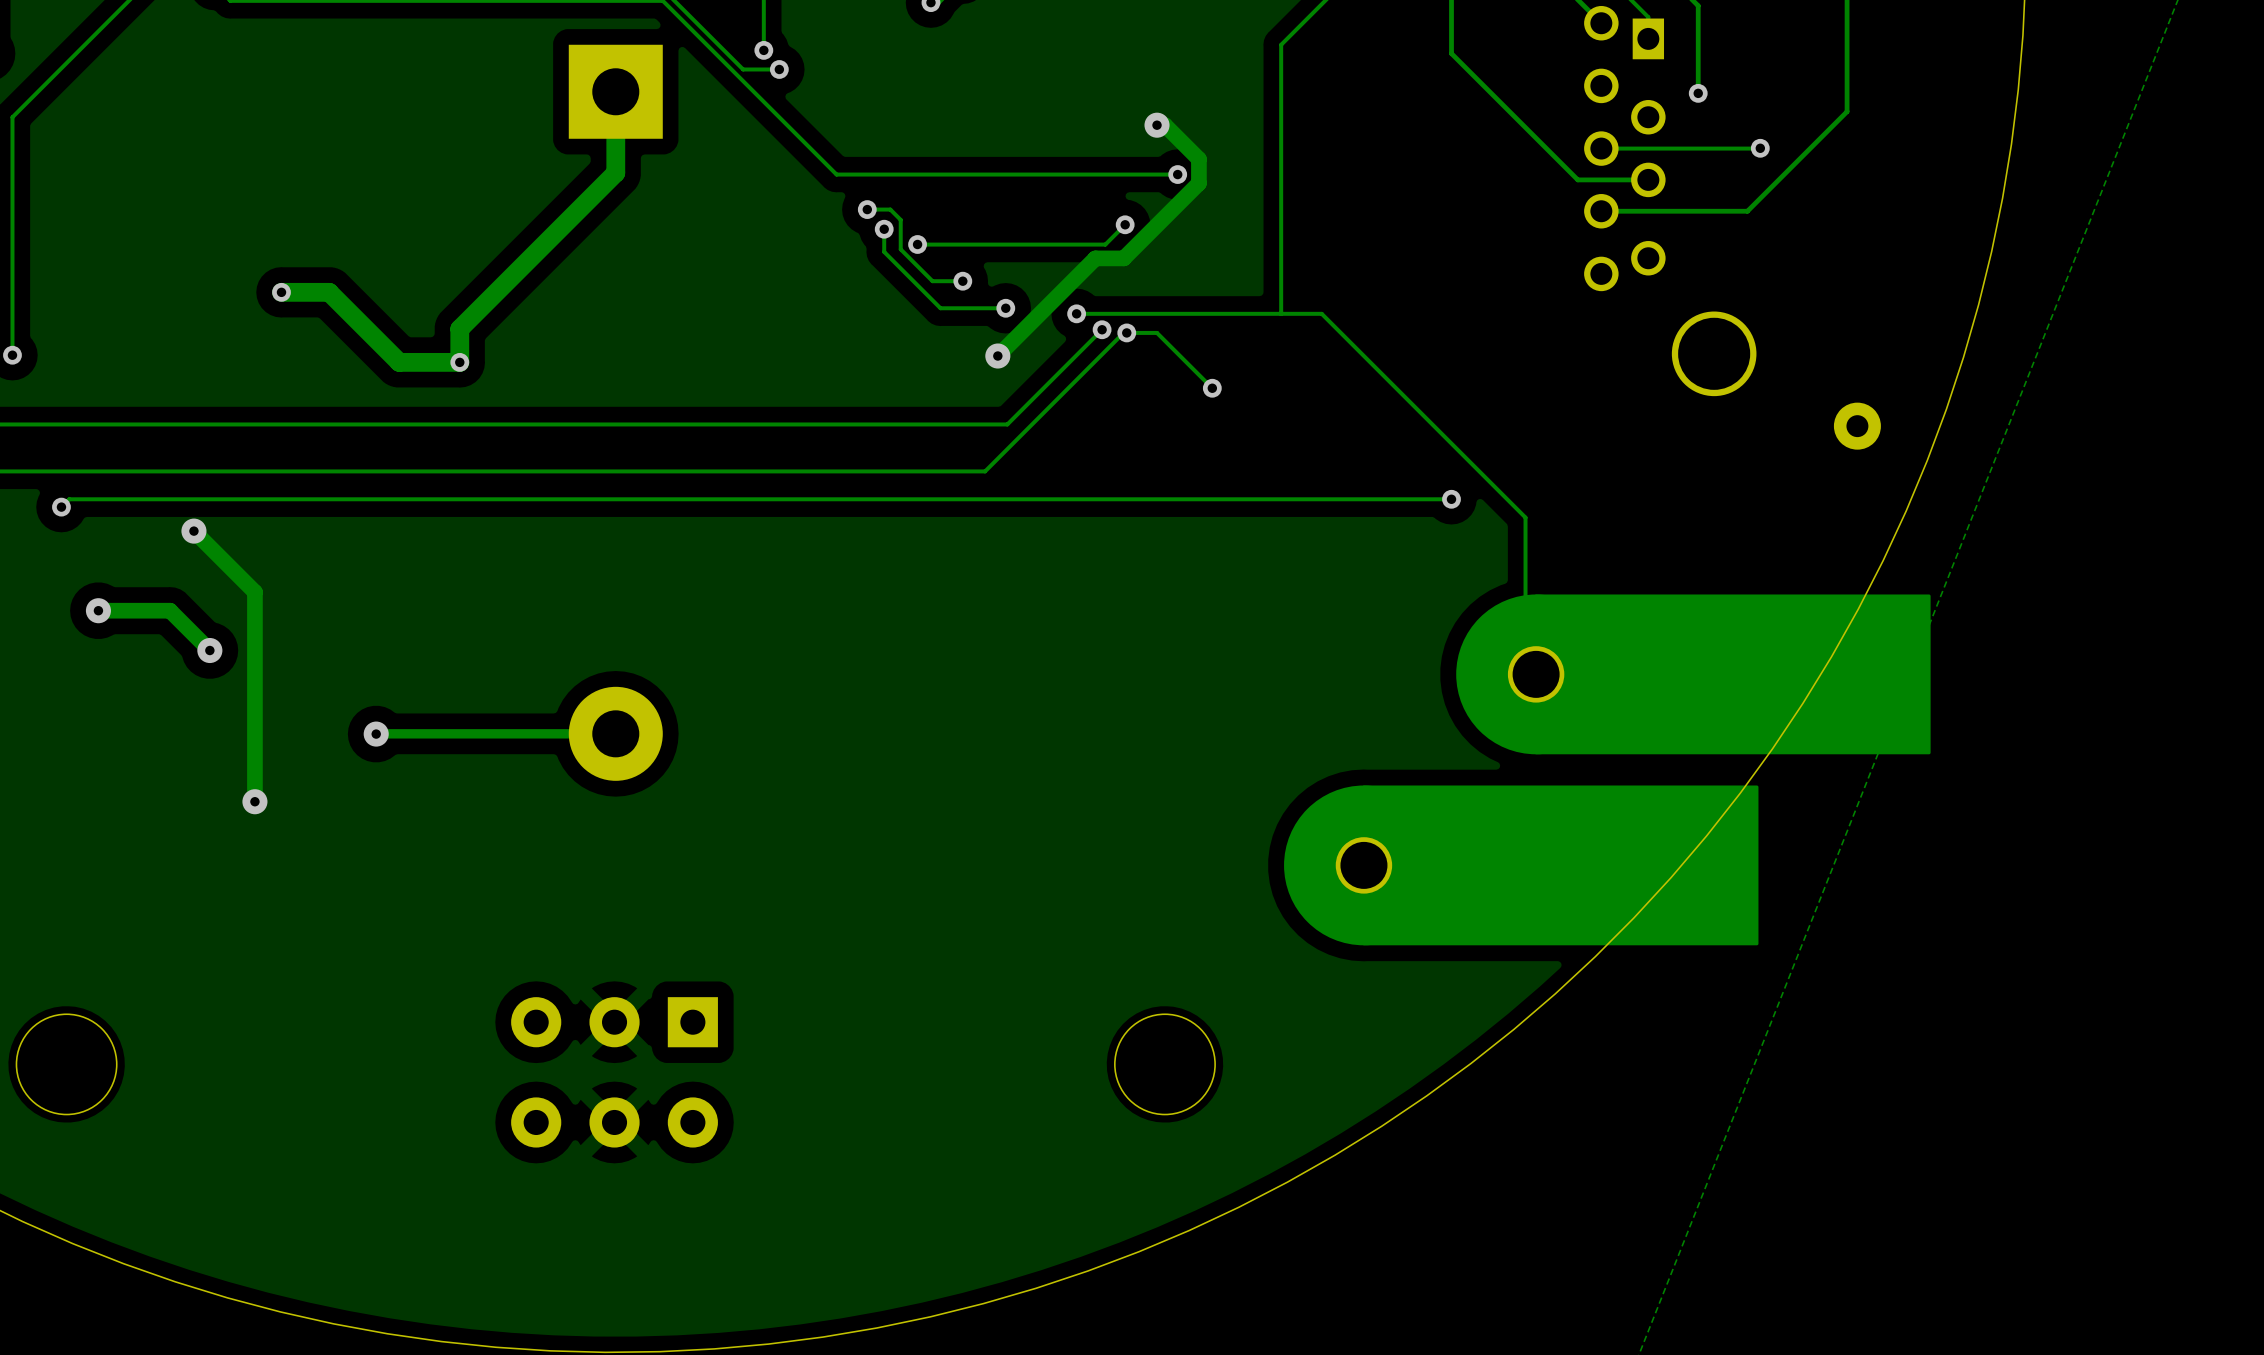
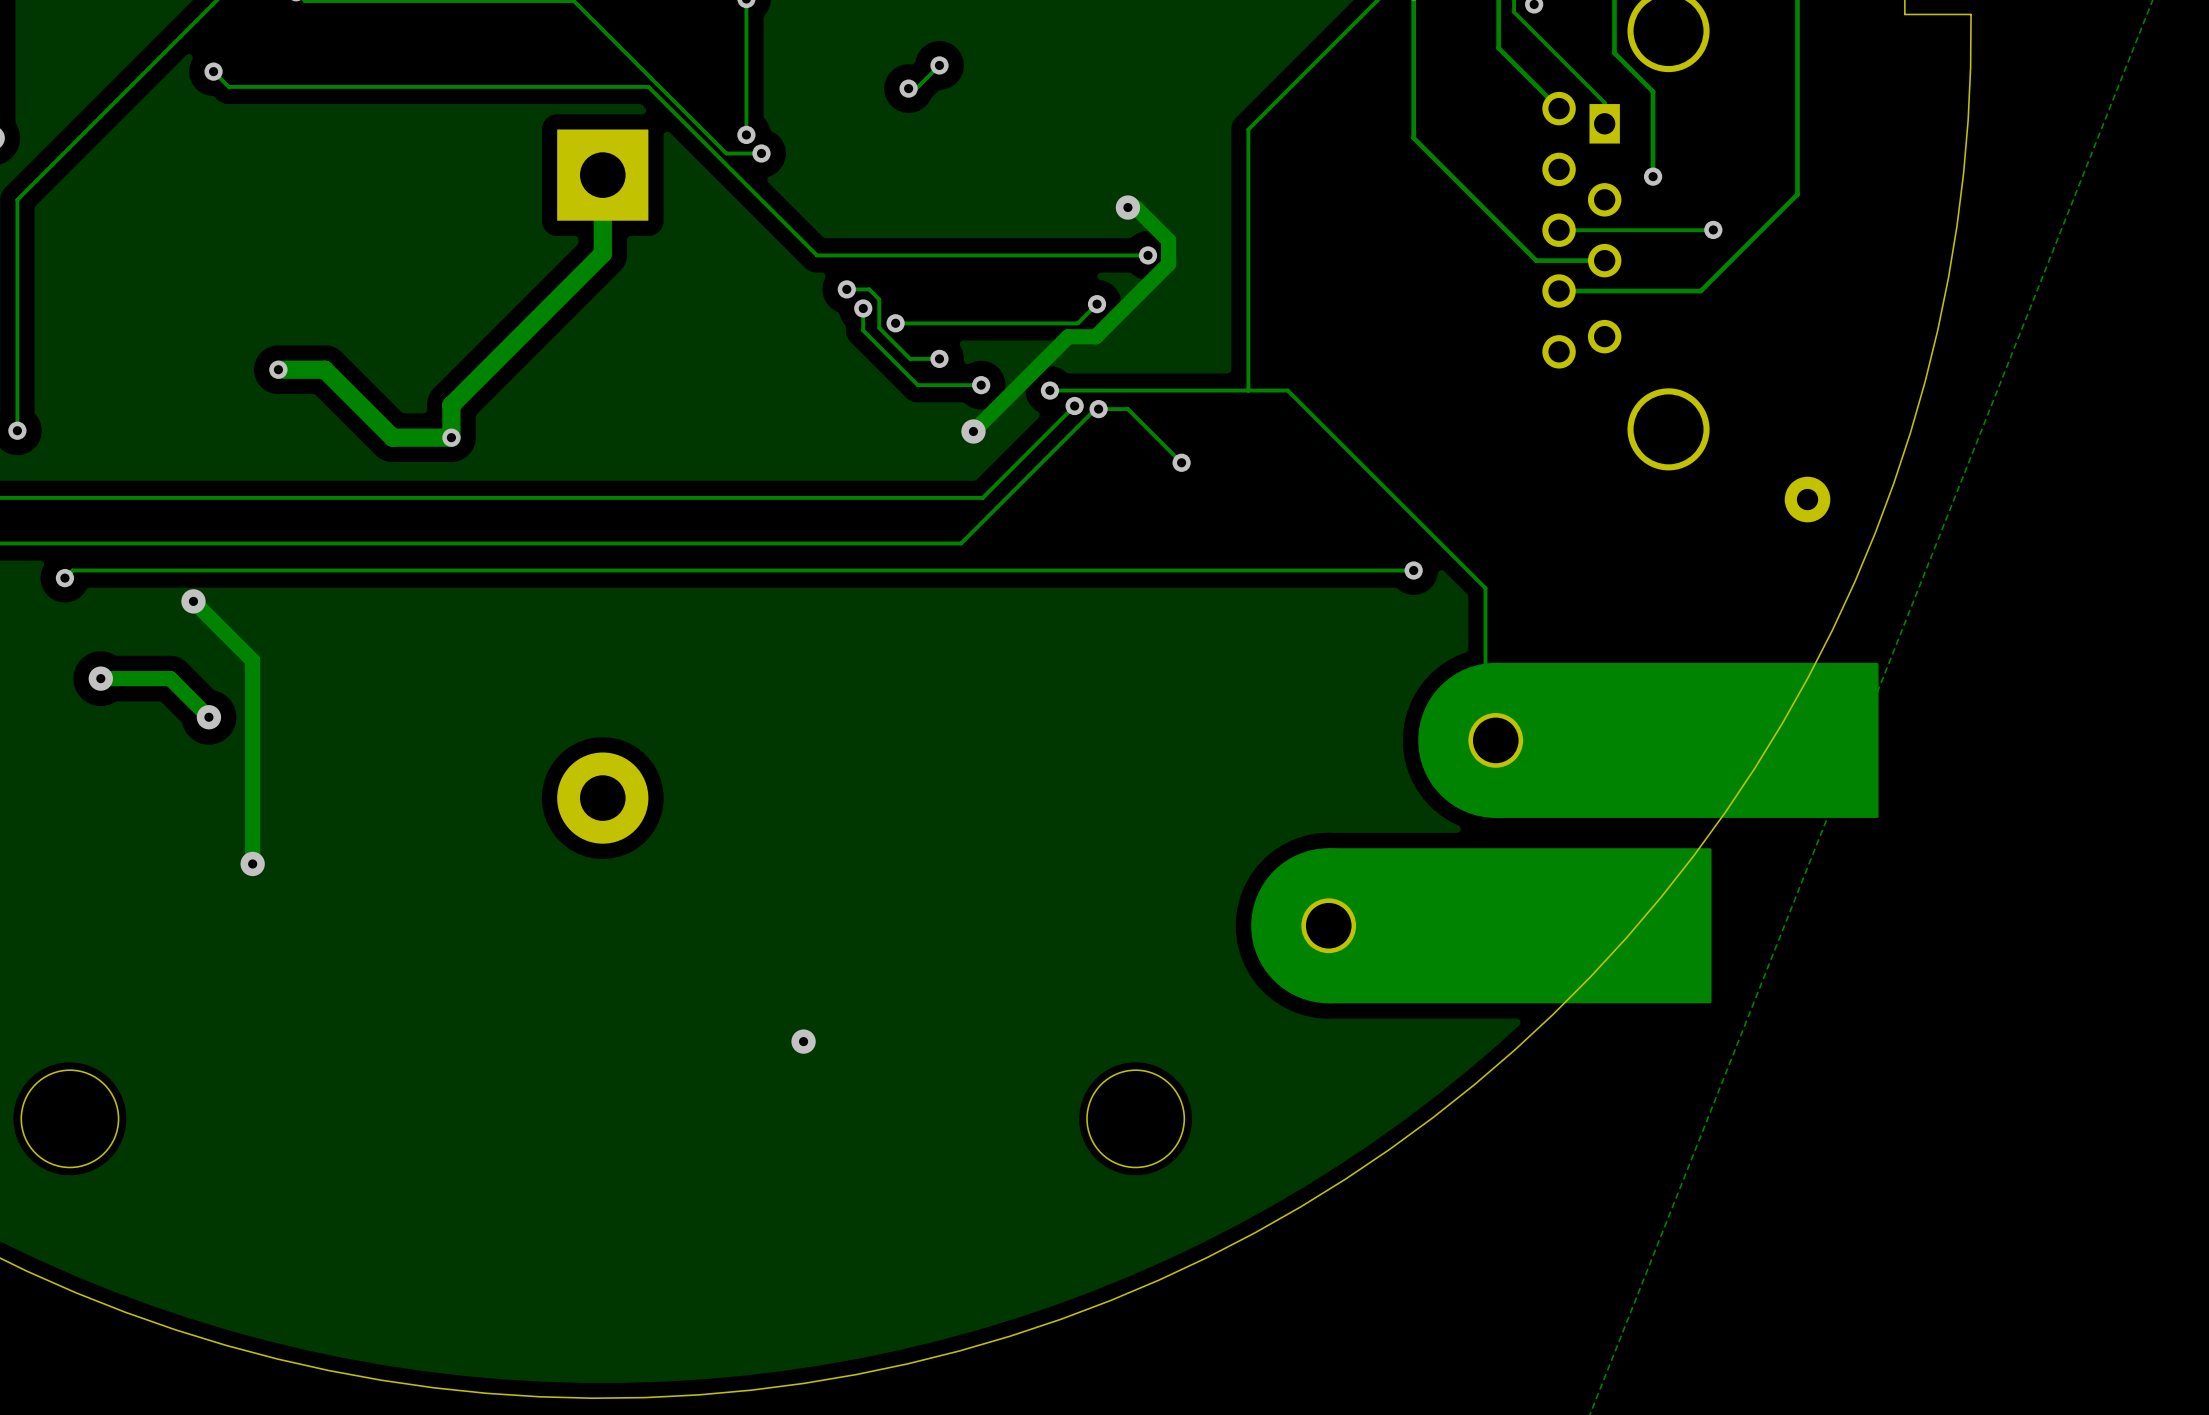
track: (615, 733) (376, 733) -> none
via: (376, 734) -> none
via: none -> (803, 1041)
part: (614, 1072) -> none

